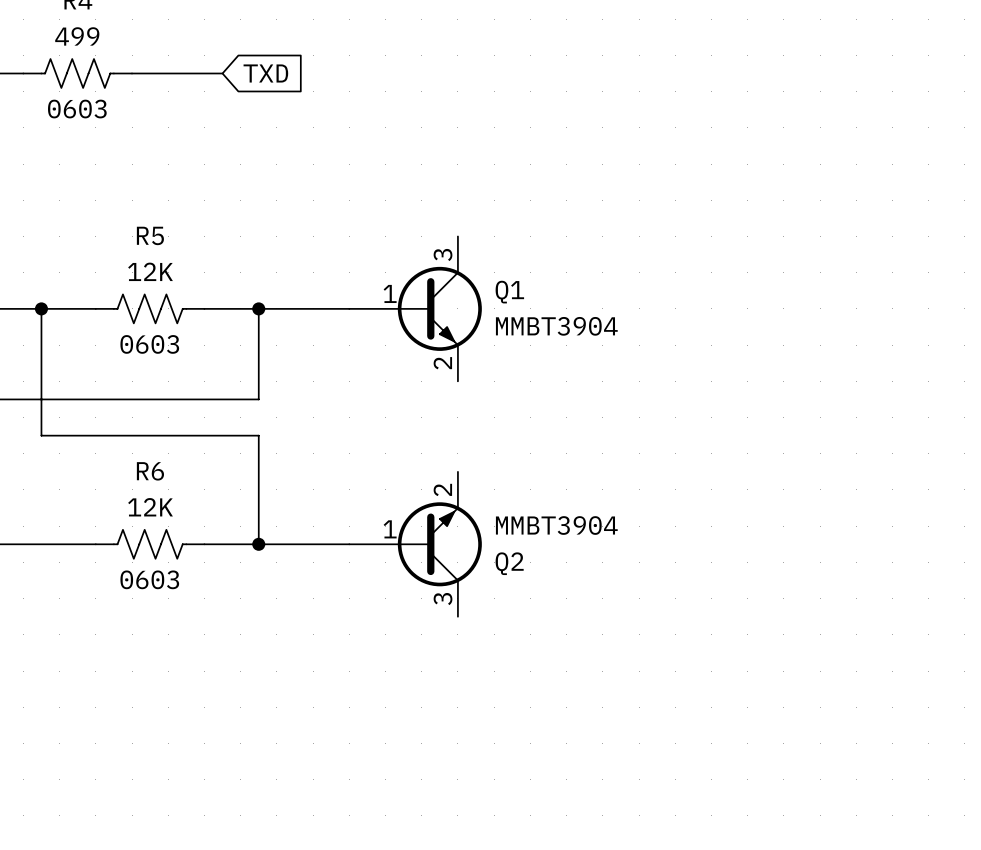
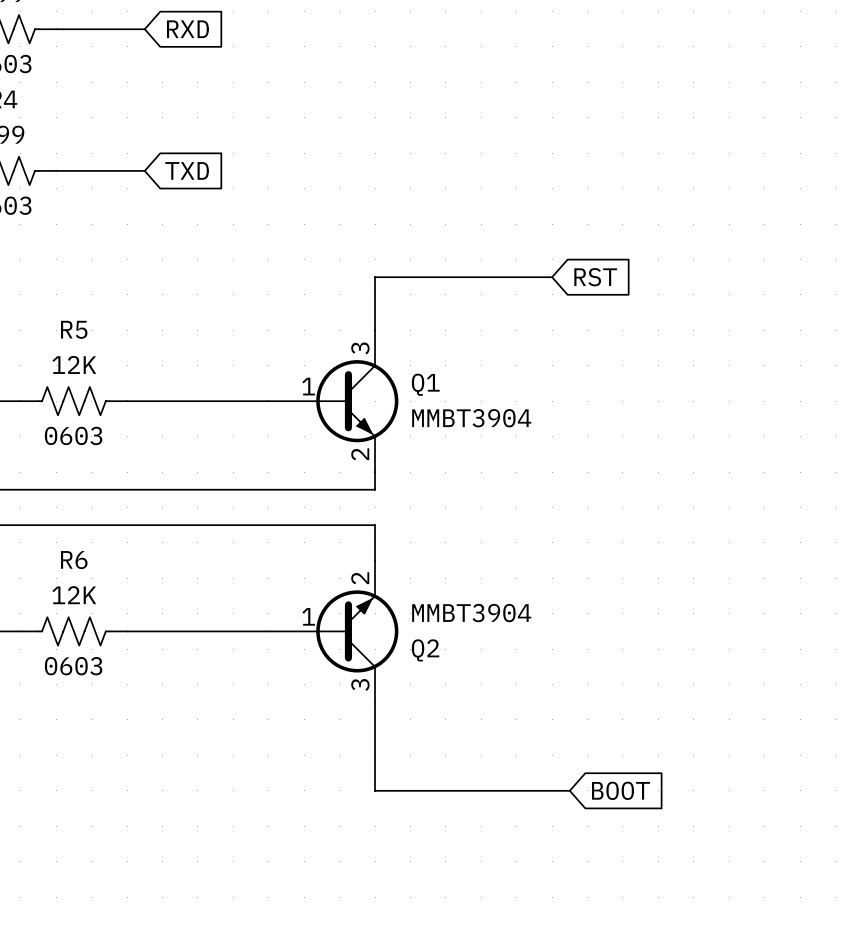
wire: none -> (552, 277) (375, 277) (375, 330)
global label: none -> RST (595, 277)
wire: (258, 308) (258, 399) -> (375, 472) (375, 489) (180, 489)
junction: (258, 308) -> none
wire: (258, 435) (258, 544) -> (180, 525) (375, 525) (375, 560)
junction: (258, 544) -> none
wire: none -> (375, 702) (375, 790) (569, 790)
global label: none -> BOOT (621, 790)

